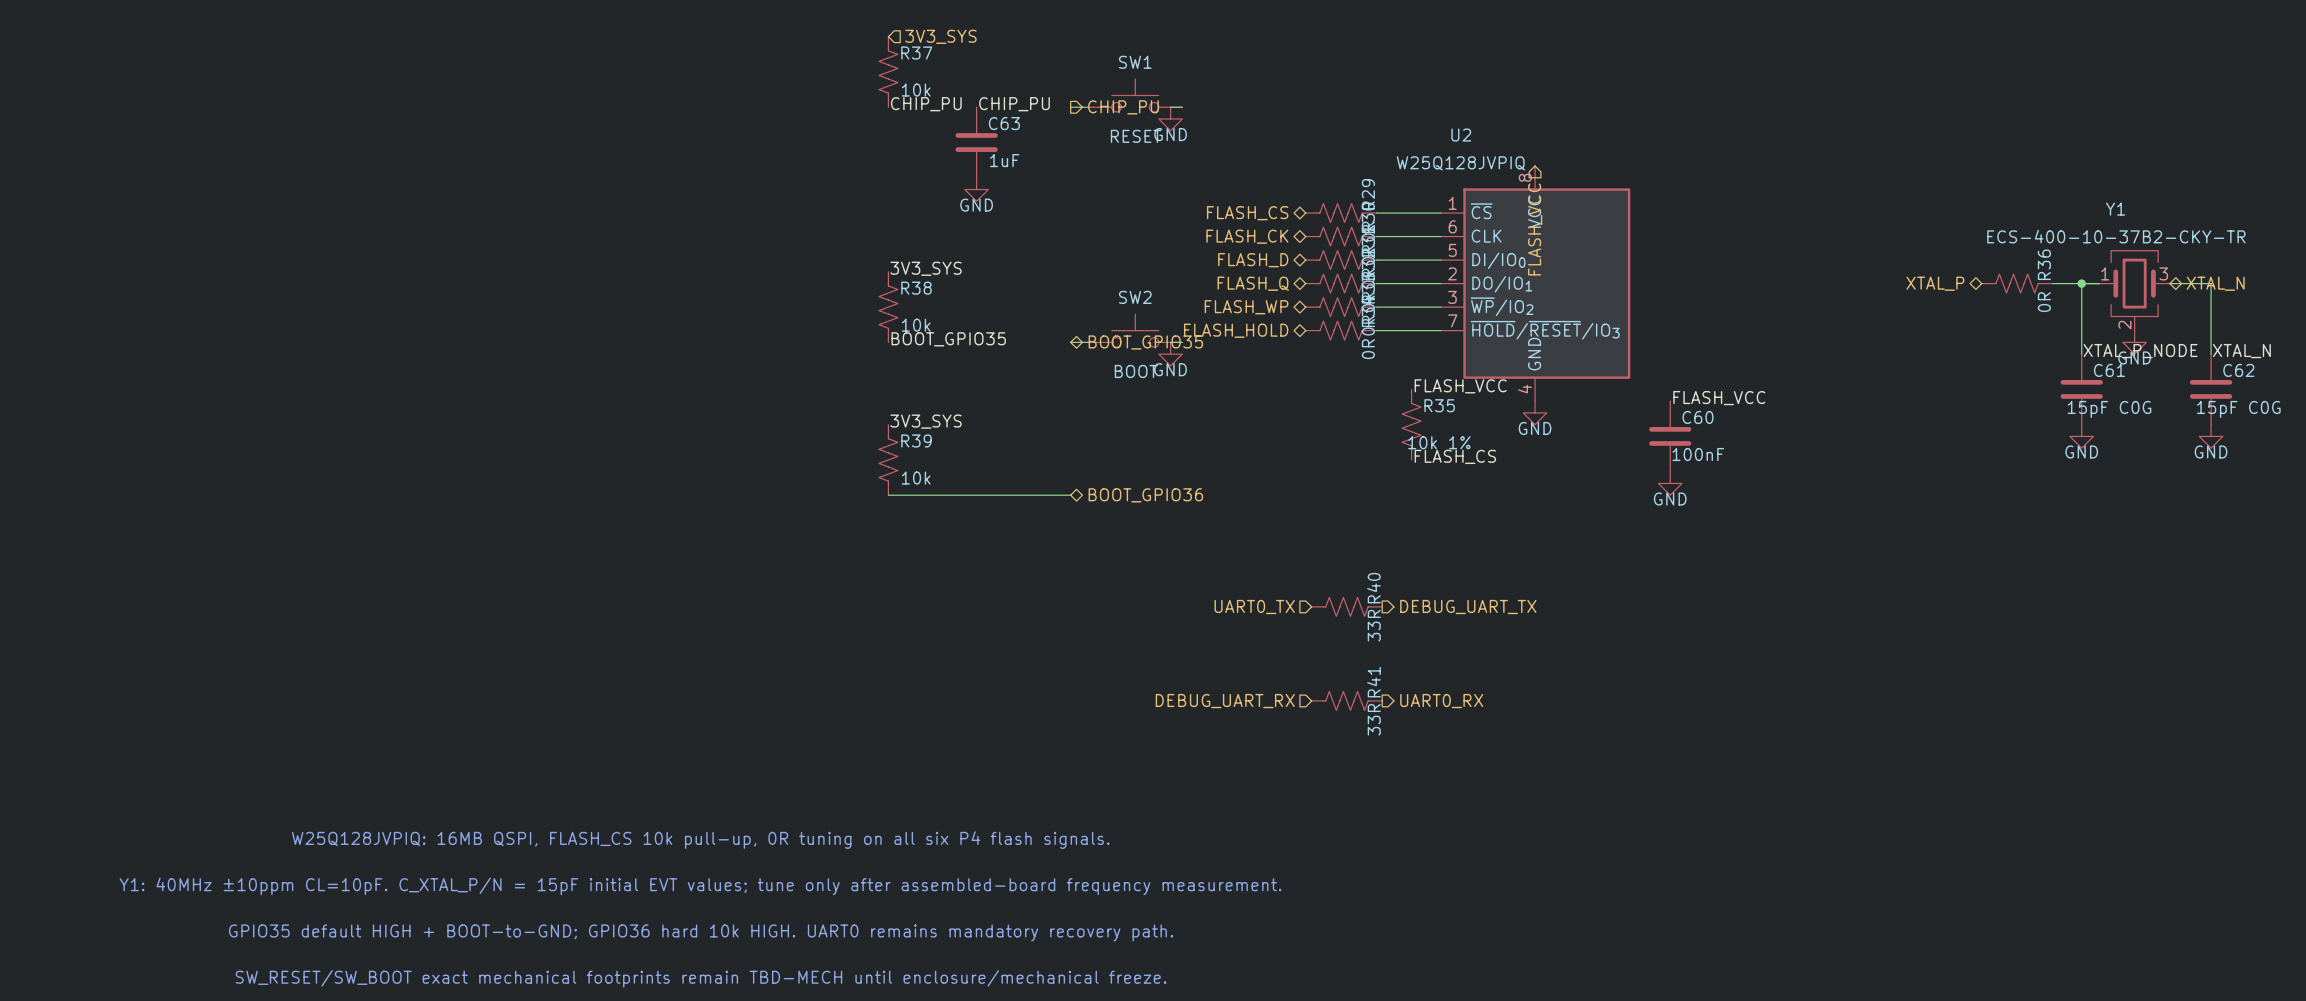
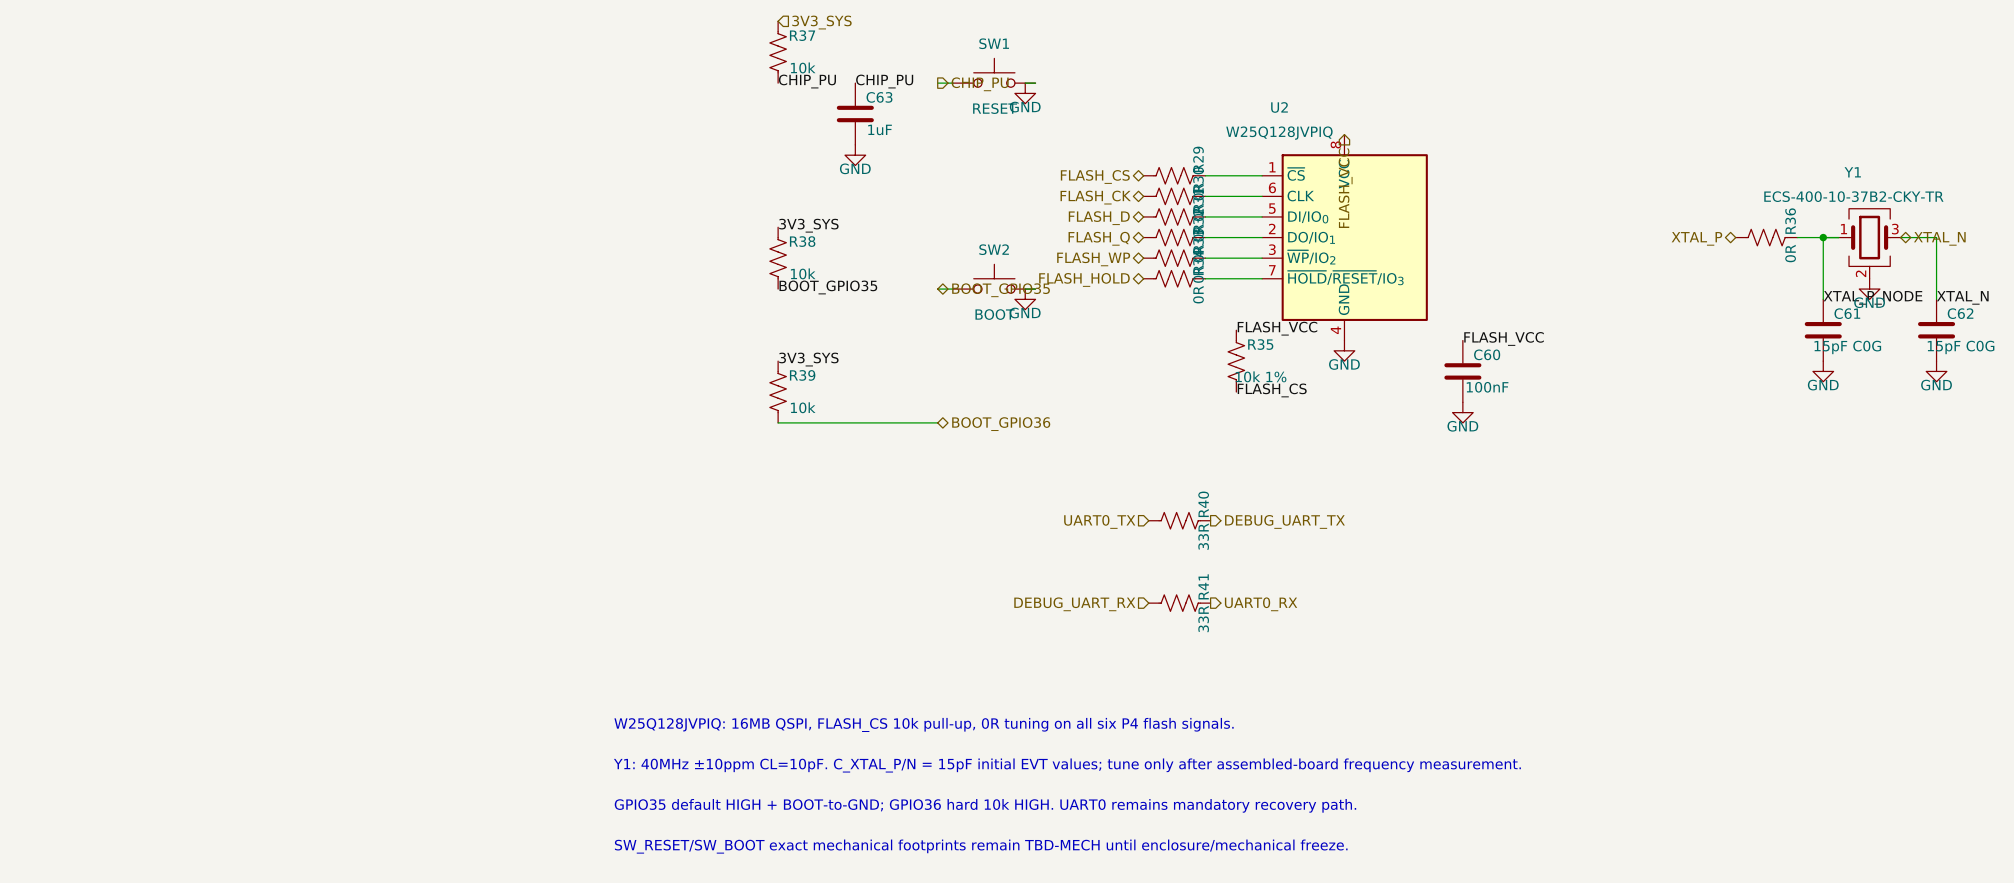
text position: W25Q128JVPIQ: 16MB QSPI, FLASH_CS 10k pull-up, 0R tuning on all six P4 flash signals. (700, 840) -> W25Q128JVPIQ: 16MB QSPI, FLASH_CS 10k pull-up, 0R tuning on all six P4 flash signals. (924, 724)
text position: Y1: 40MHz ±10ppm CL=10pF. C_XTAL_P/N = 15pF initial EVT values; tune only after assembled-board frequency measurement. (700, 886) -> Y1: 40MHz ±10ppm CL=10pF. C_XTAL_P/N = 15pF initial EVT values; tune only after assembled-board frequency measurement. (1067, 765)
text position: GPIO35 default HIGH + BOOT-to-GND; GPIO36 hard 10k HIGH. UART0 remains mandatory recovery path. (701, 932) -> GPIO35 default HIGH + BOOT-to-GND; GPIO36 hard 10k HIGH. UART0 remains mandatory recovery path. (985, 805)
text position: SW_RESET/SW_BOOT exact mechanical footprints remain TBD-MECH until enclosure/mechanical freeze. (701, 978) -> SW_RESET/SW_BOOT exact mechanical footprints remain TBD-MECH until enclosure/mechanical freeze. (981, 846)

